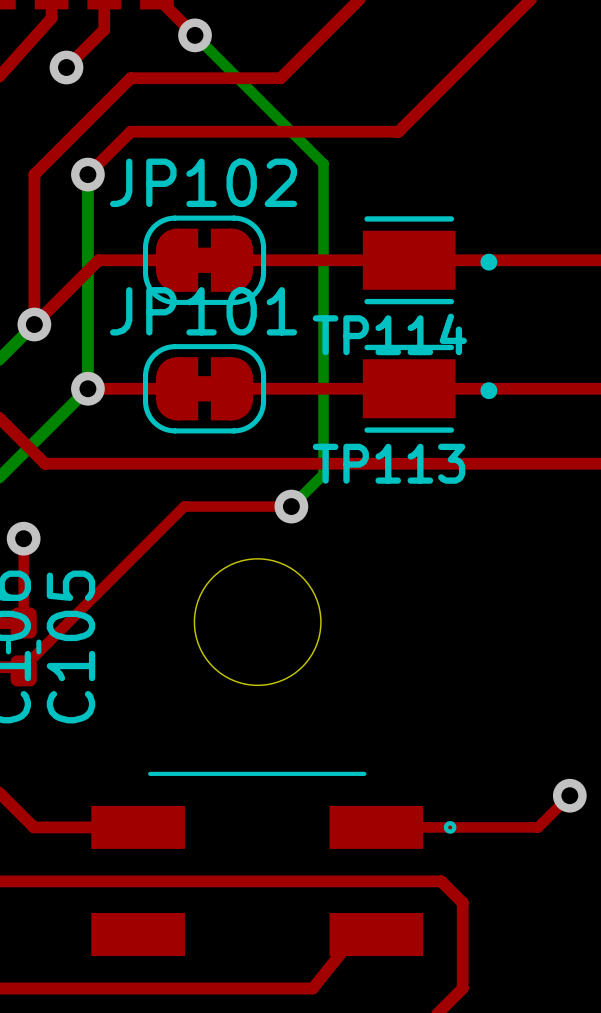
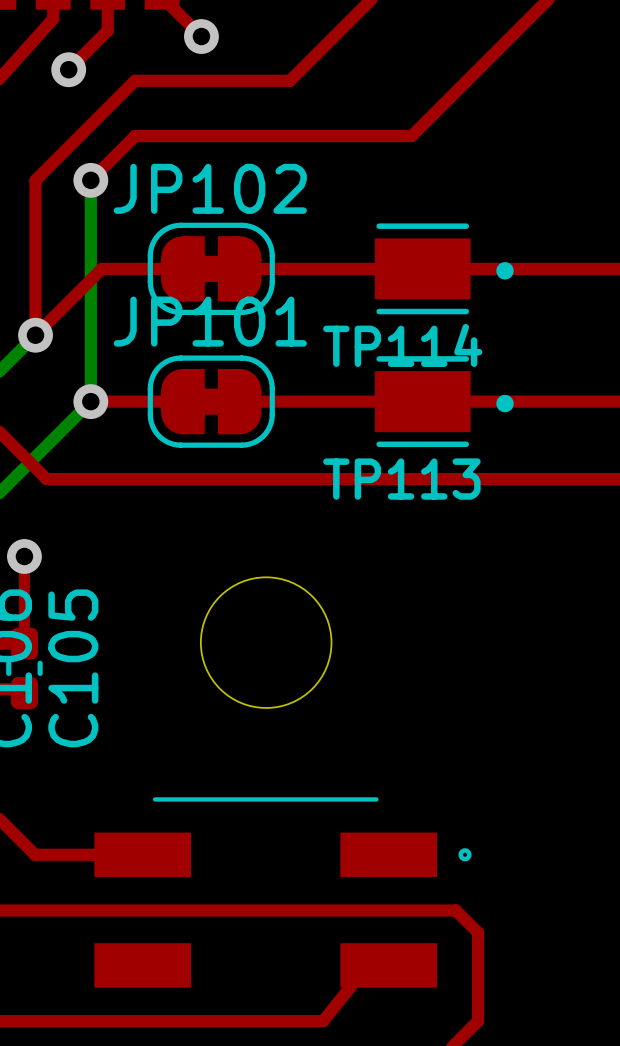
bottom track: (195, 35) (323, 163) (323, 474) (291, 506) -> none
top track: (291, 506) (184, 506) (23, 667) -> none
via: (291, 506) -> none
top track: (569, 795) (538, 827) (376, 827) -> none
via: (569, 795) -> none

